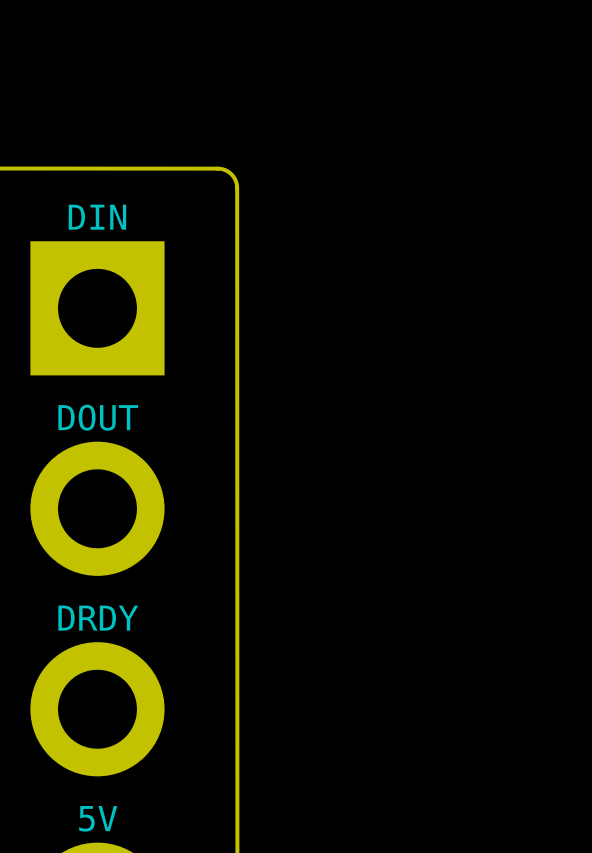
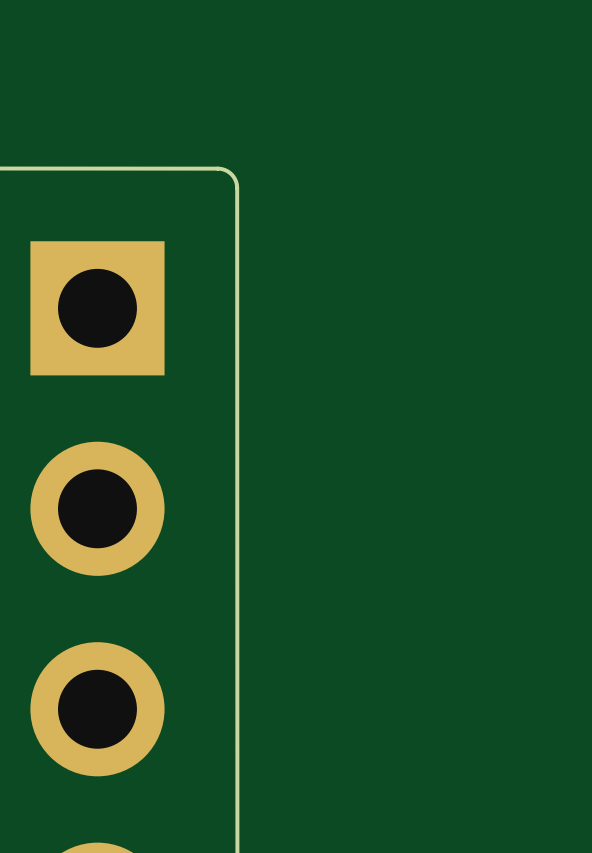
text: DIN (97, 217) -> none
text: DOUT (98, 417) -> none
text: DRDY (98, 618) -> none
text: 5V (98, 818) -> none

